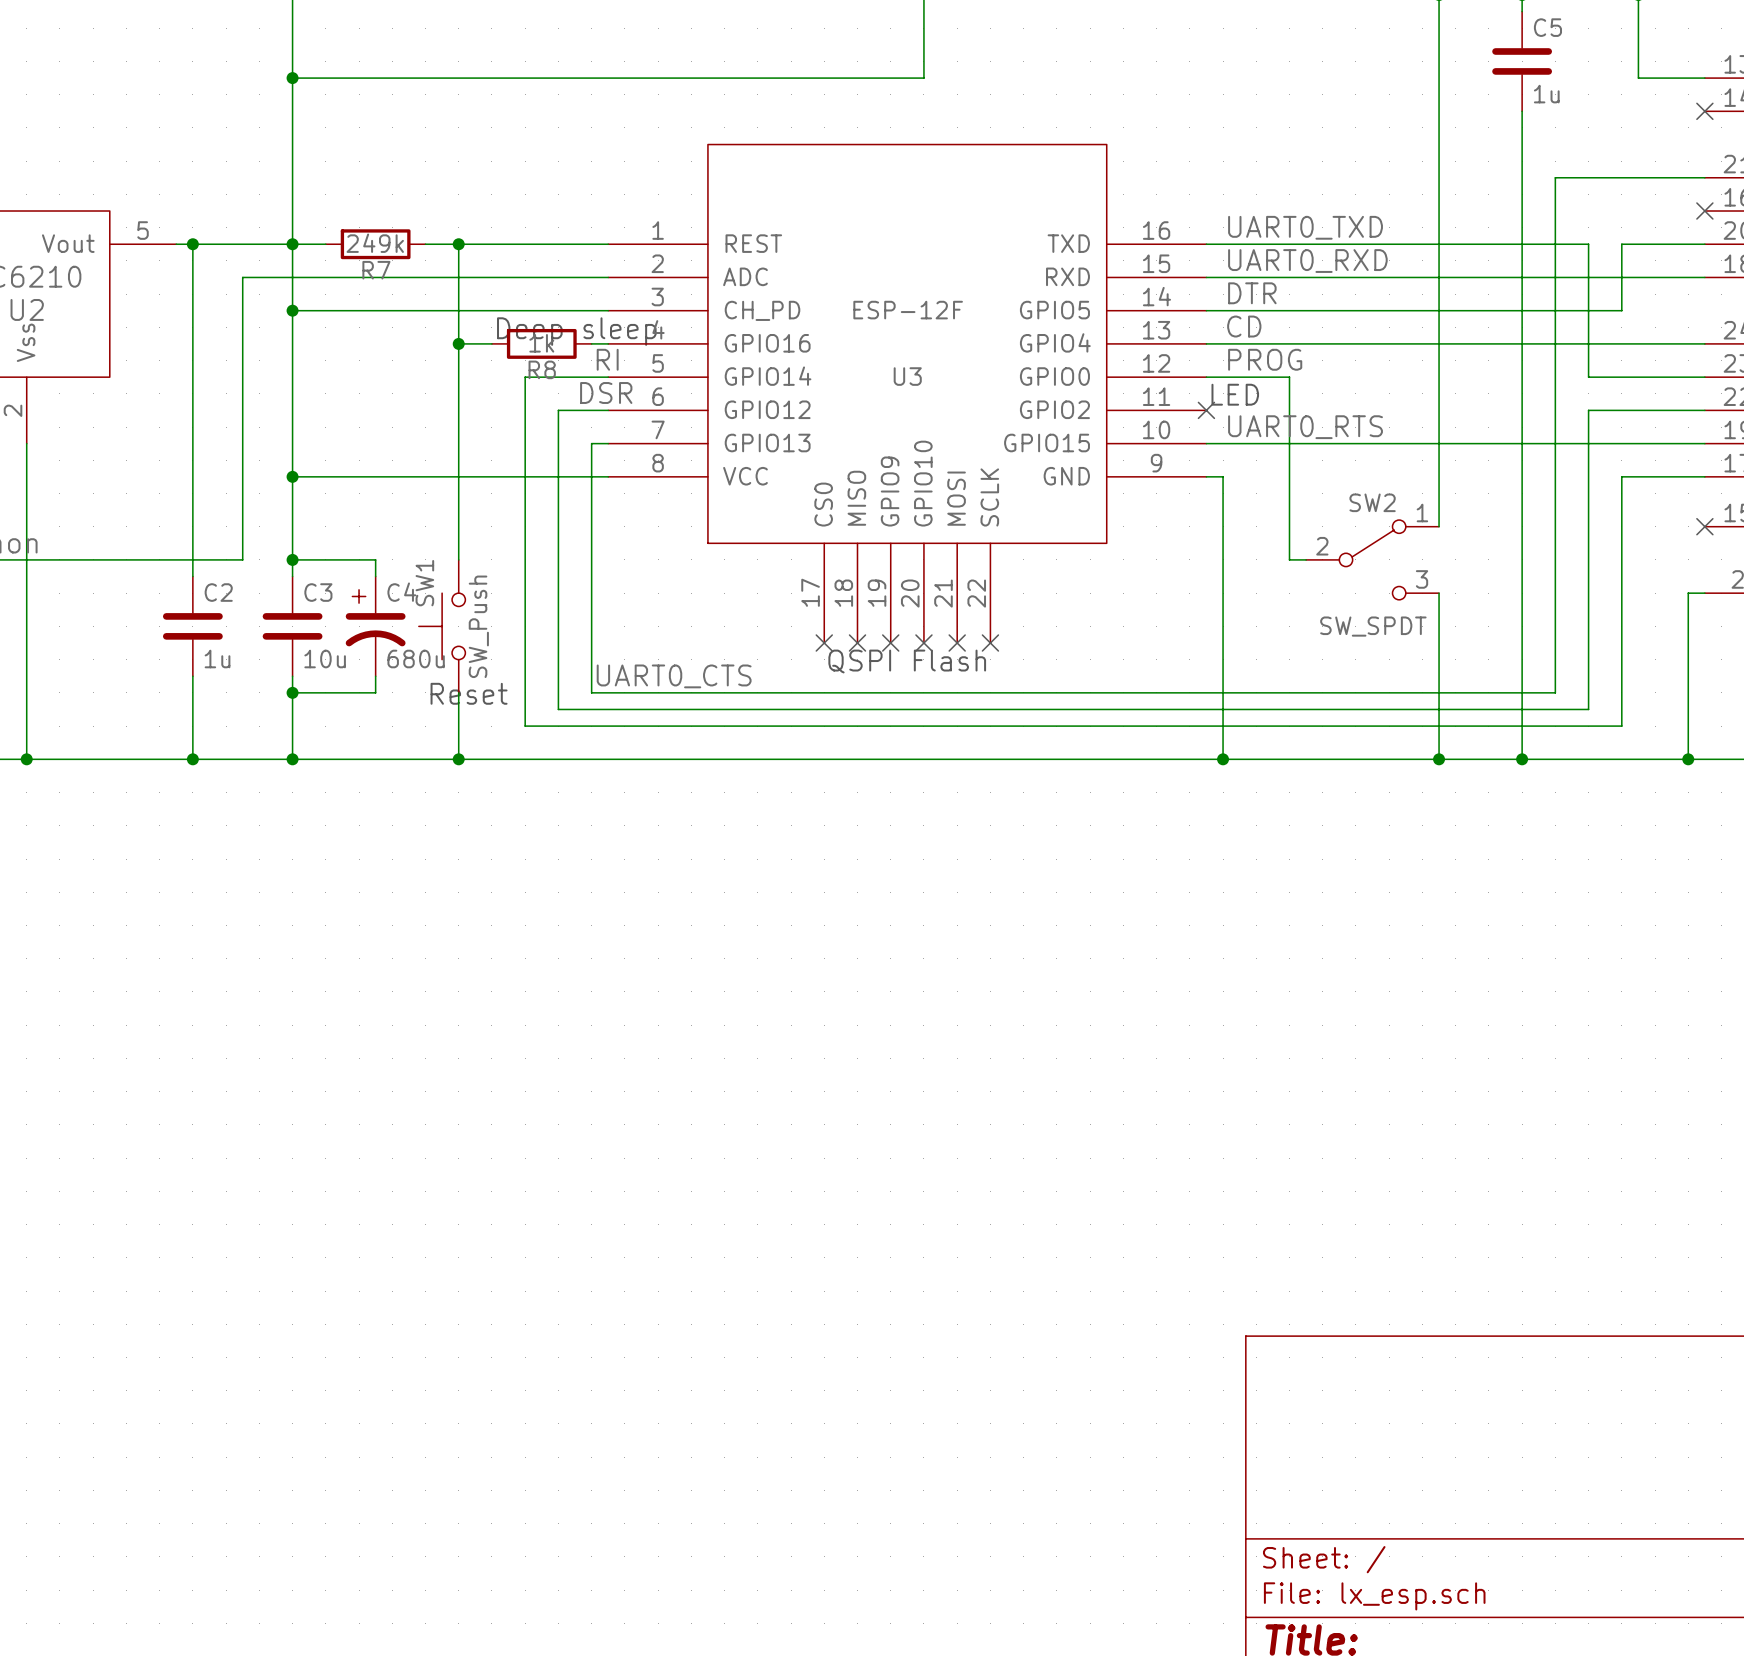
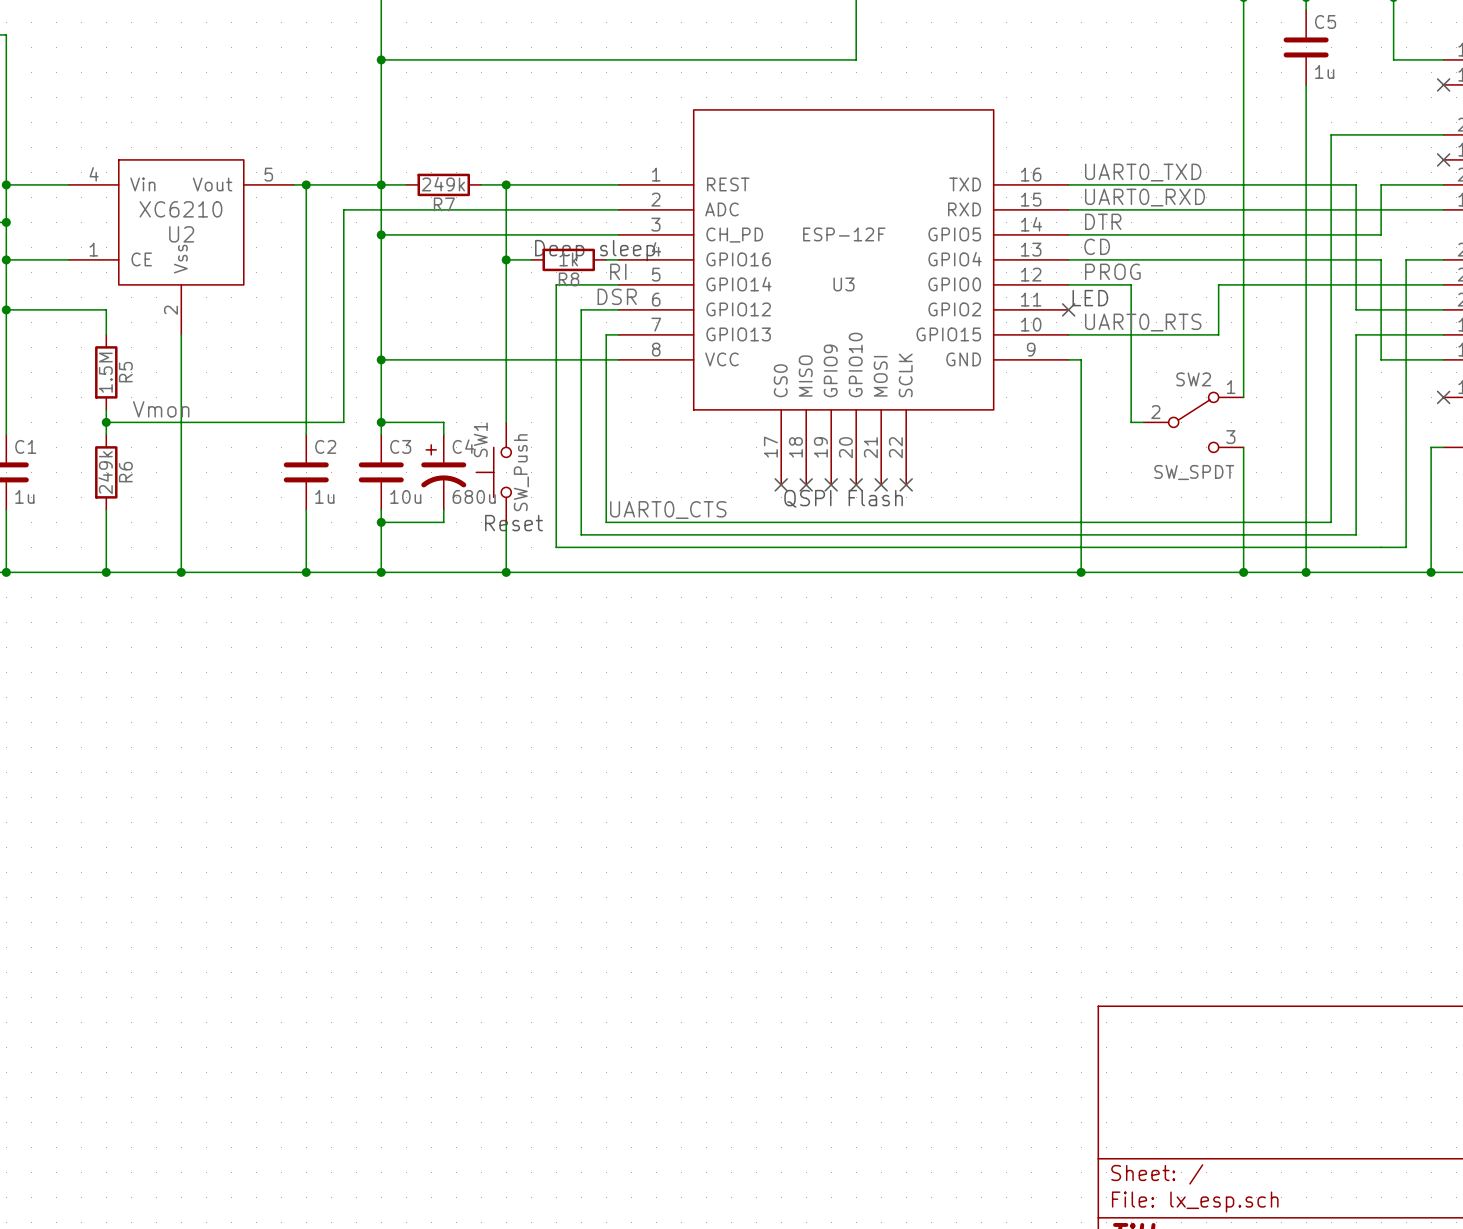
wire: (1621, 343) (1655, 343) -> (1381, 259) (1381, 359)
wire: (1588, 410) (1588, 443) (1405, 443) -> (1356, 309) (1356, 284) (1218, 284) (1218, 334)
wire: (1621, 476) (1621, 726) -> (1406, 259) (1406, 547) (1381, 547)

